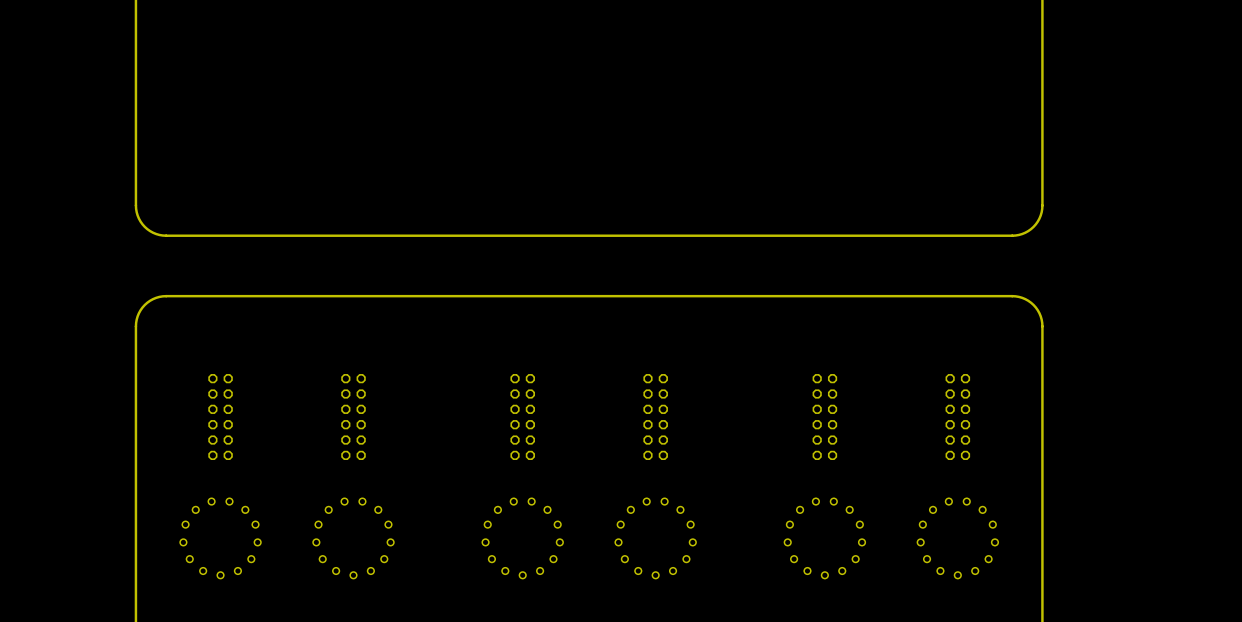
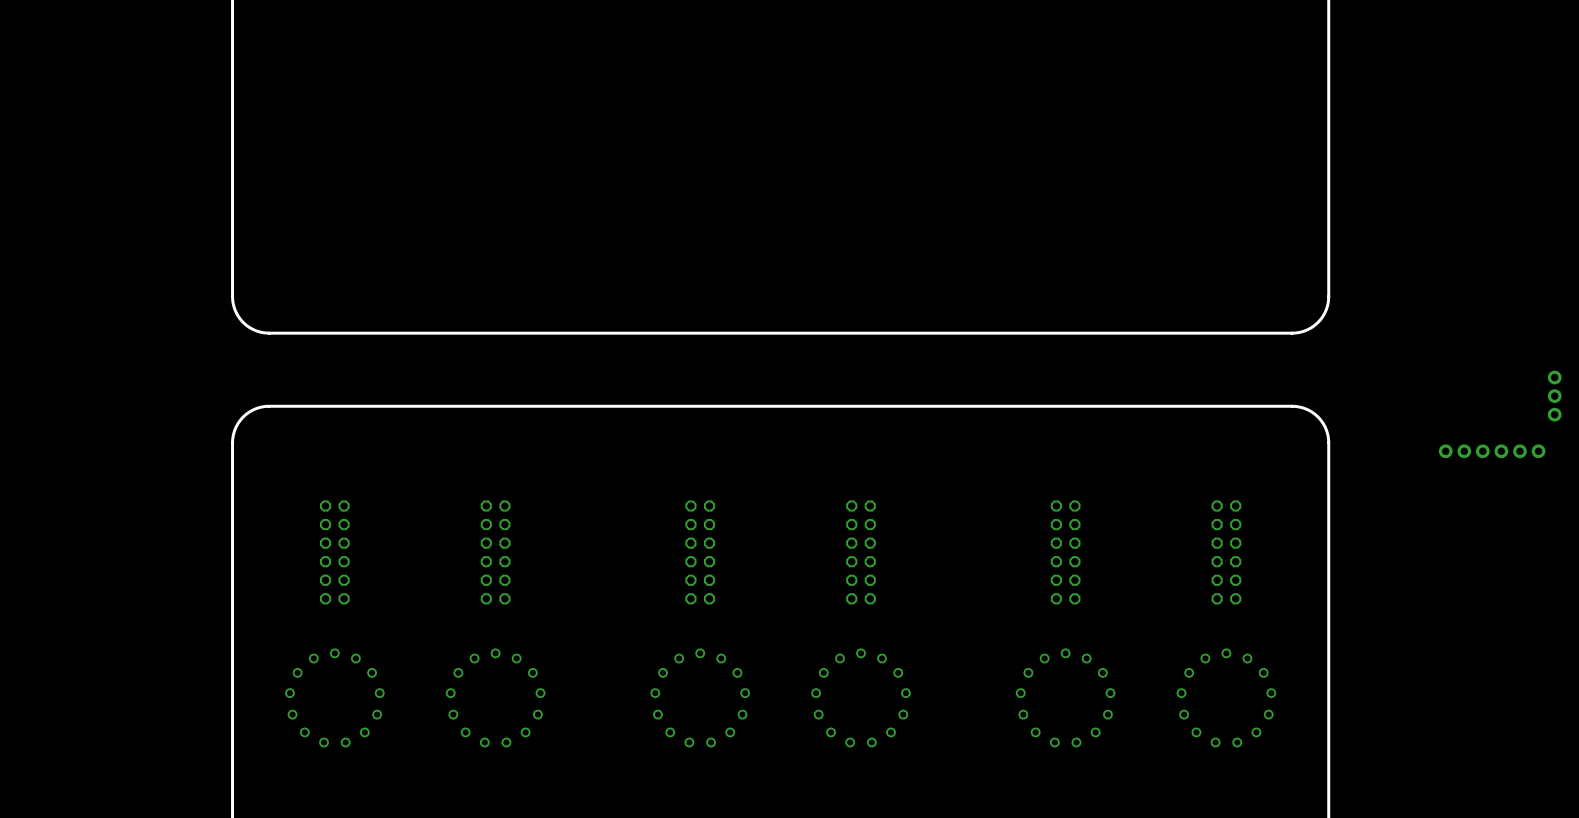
part: none -> (1554, 396)
part: none -> (1492, 451)
part rotation: 0° (220, 538) -> 180° (334, 697)
part rotation: 0° (353, 538) -> 180° (495, 697)
part rotation: 0° (522, 538) -> 180° (700, 697)
part rotation: 0° (655, 538) -> 180° (861, 697)
part rotation: 0° (824, 538) -> 180° (1065, 697)
part rotation: 0° (957, 538) -> 180° (1226, 697)

